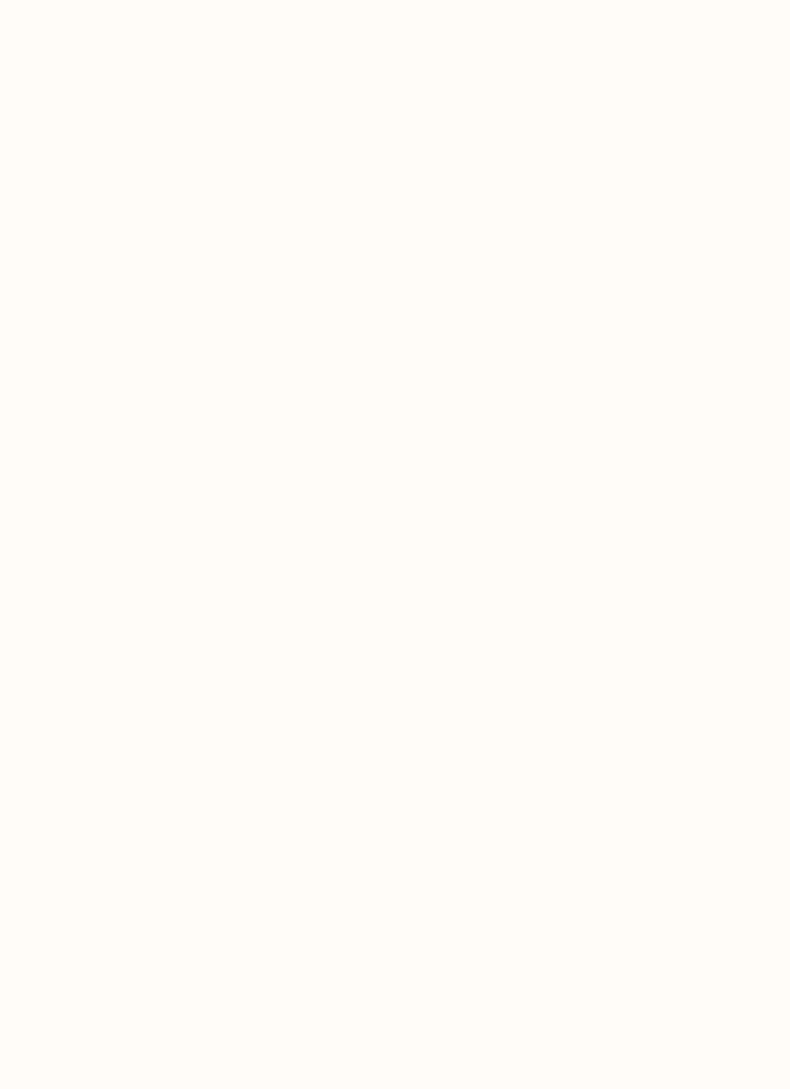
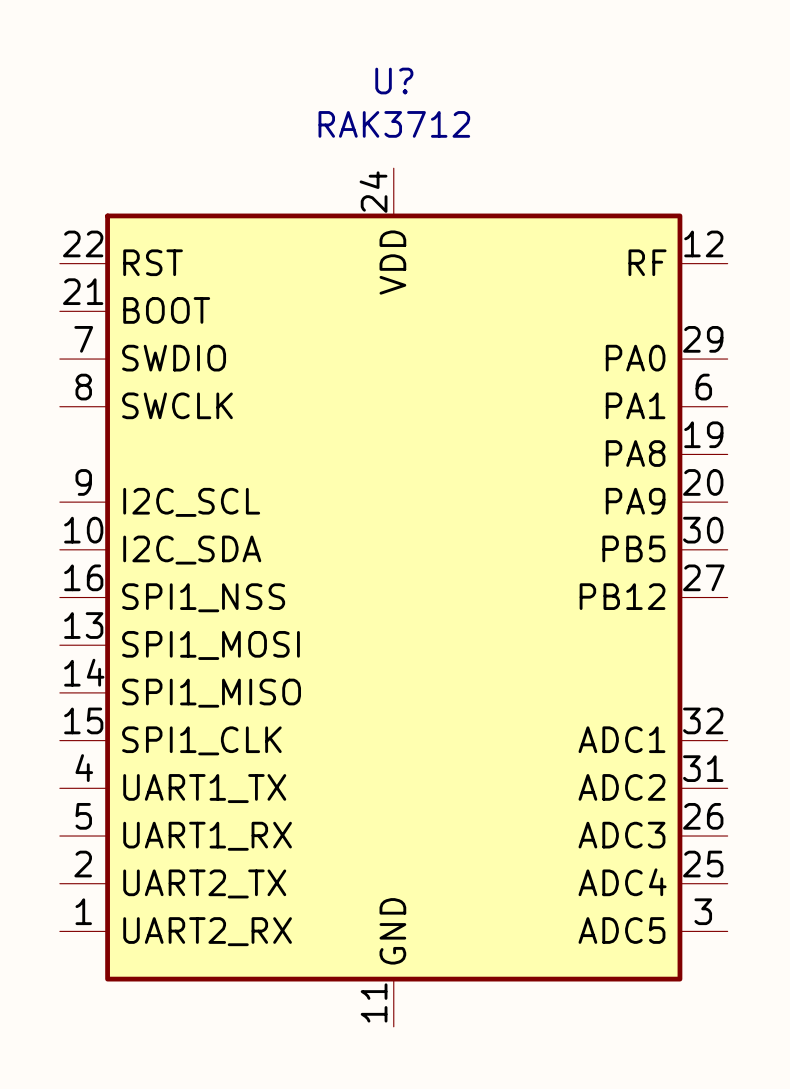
U?: none -> RAK3712 (393, 597)

